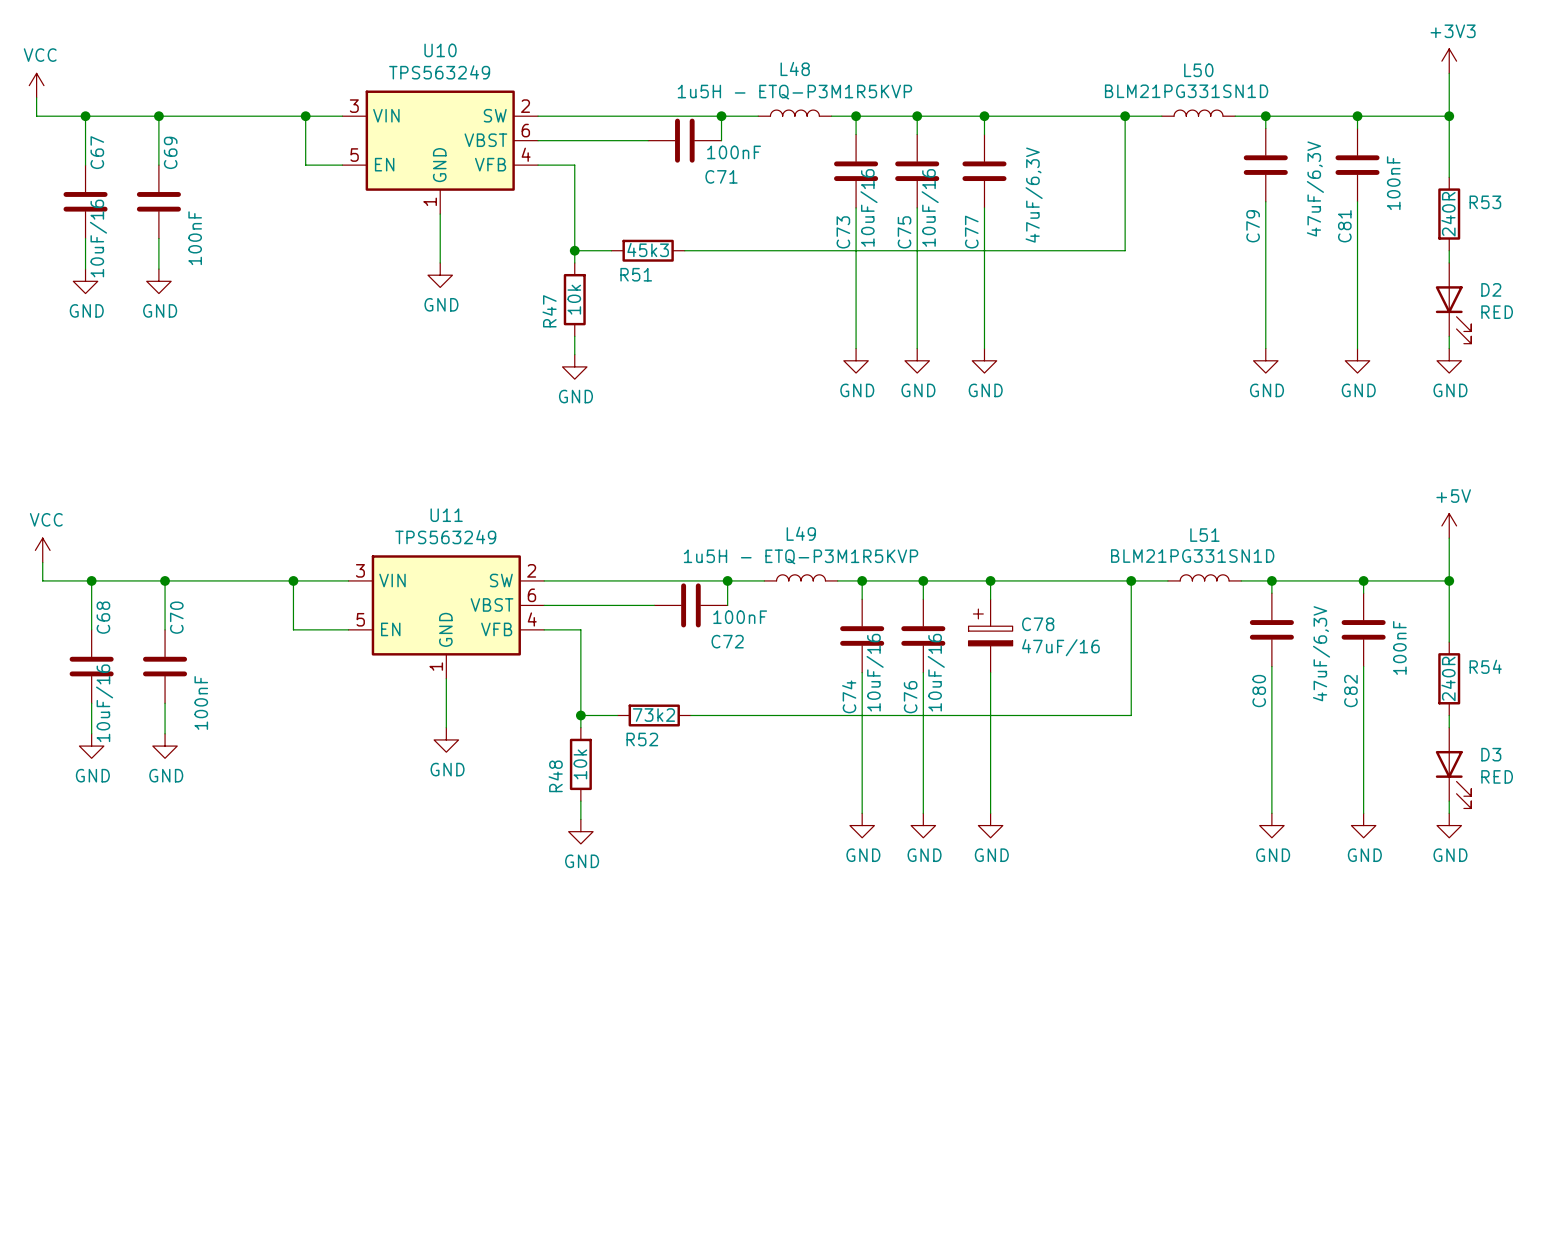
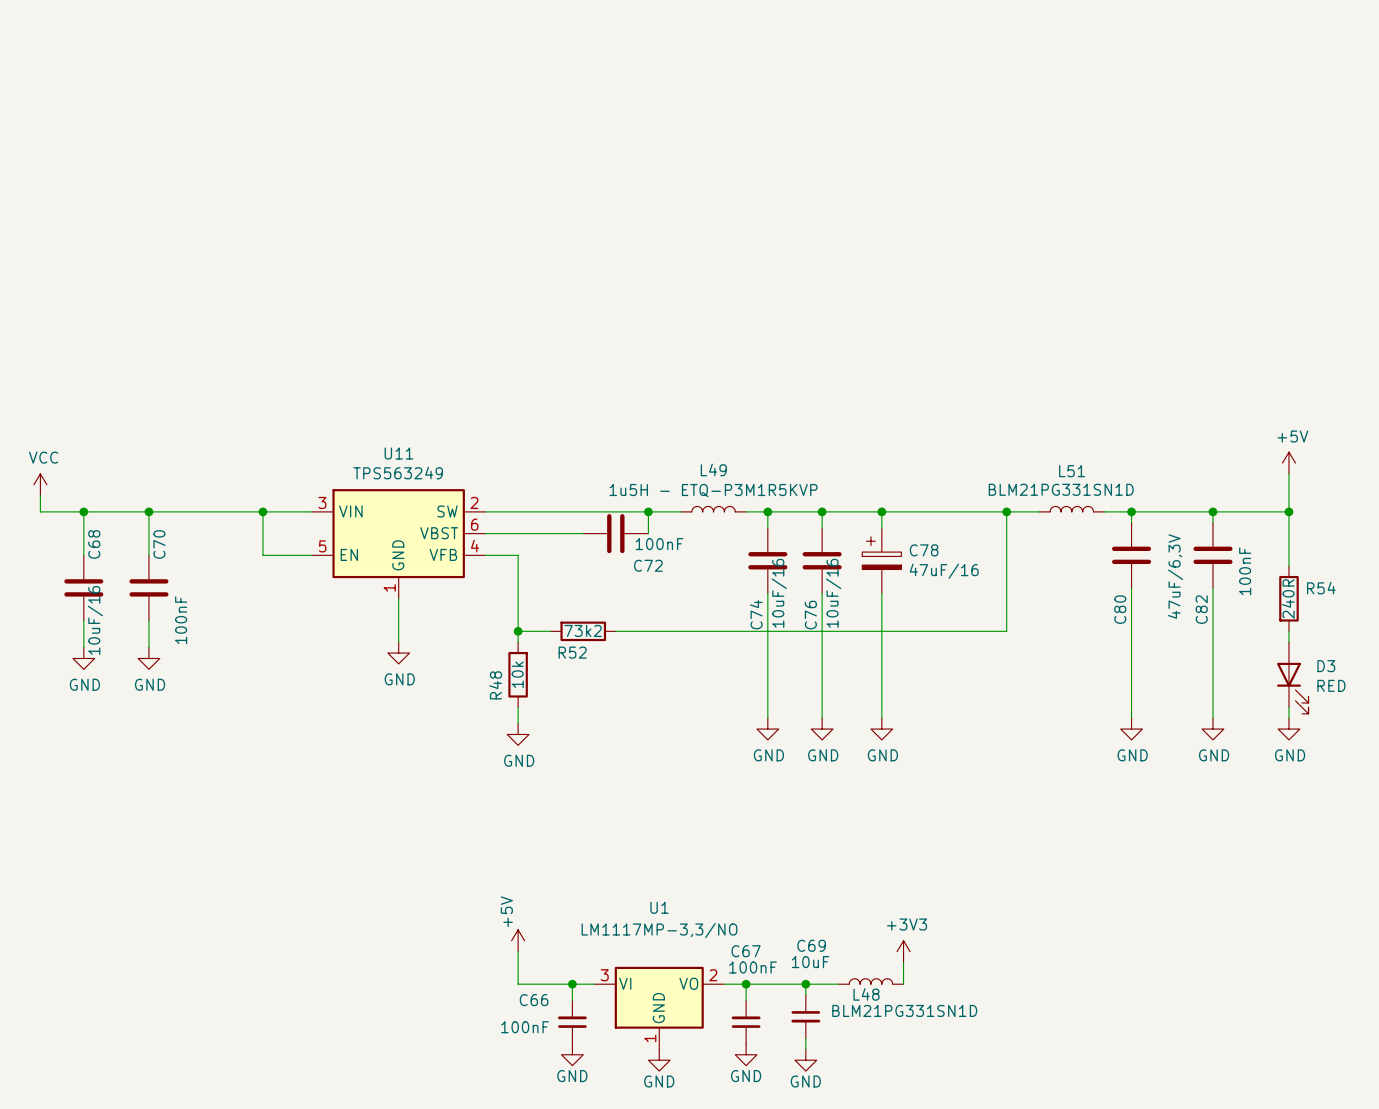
power symbol: +3V3 (1449, 61) -> none
L48 name position: L48 (795, 68) -> L48 (866, 994)
wire: (1449, 73) (1449, 177) -> none
power symbol: VCC (36, 85) -> none
L48 value: 1u5H - ETQ-P3M1R5KVP (794, 92) -> BLM21PG331SN1D (904, 1010)
wire: (36, 97) (36, 116) (342, 116) -> none
L48 position: (794, 113) -> (870, 981)
L50: BLM21PG331SN1D (1198, 113) -> none
wire: (85, 116) (85, 165) -> none
junction: (85, 116) -> none
wire: (158, 116) (158, 165) -> none
junction: (158, 116) -> none
wire: (305, 116) (305, 165) (342, 165) -> none
junction: (305, 116) -> none
wire: (538, 116) (758, 116) -> none
wire: (721, 116) (721, 140) -> none
junction: (721, 116) -> none
wire: (831, 116) (1161, 116) -> none
wire: (856, 116) (856, 134) -> none
junction: (856, 116) -> none
wire: (917, 116) (917, 134) -> none
junction: (917, 116) -> none
wire: (984, 116) (984, 134) -> none
junction: (984, 116) -> none
wire: (1125, 116) (1125, 250) (684, 250) -> none
junction: (1125, 116) -> none
wire: (1235, 116) (1449, 116) -> none
wire: (1265, 116) (1265, 128) -> none
junction: (1265, 116) -> none
wire: (1357, 116) (1357, 128) -> none
junction: (1357, 116) -> none
junction: (1449, 116) -> none
wire: (538, 140) (648, 140) -> none
C71: 100nF (684, 140) -> none
C67 name position: C67 (97, 152) -> C67 (746, 951)
C69 name position: C69 (170, 152) -> C69 (811, 945)
U10: TPS563249 (440, 152) -> none
C67 symbol: [63, 165, 108, 239] -> [731, 1000, 761, 1044]
C69 symbol: [136, 165, 181, 239] -> [791, 995, 821, 1039]
wire: (538, 165) (574, 165) (574, 262) -> none
C79: 47uF/6,3V (1265, 165) -> none
C81: 100nF (1357, 165) -> none
C73: 10uF/16 (856, 171) -> none
C75: 10uF/16 (917, 171) -> none
C77: 47uF/6,3V (984, 171) -> none
wire: (1265, 201) (1265, 348) -> none
wire: (1357, 201) (1357, 348) -> none
wire: (856, 207) (856, 348) -> none
wire: (917, 207) (917, 348) -> none
wire: (984, 207) (984, 348) -> none
wire: (440, 214) (440, 262) -> none
R53: 240R (1449, 214) -> none
wire: (85, 238) (85, 269) -> none
C67 value: 10uF/16 (98, 238) -> 100nF (753, 967)
wire: (158, 238) (158, 269) -> none
C69 value: 100nF (195, 238) -> 10uF (810, 962)
wire: (574, 250) (611, 250) -> none
junction: (574, 250) -> none
R51: 45k3 (648, 250) -> none
wire: (1449, 250) (1449, 262) -> none
power symbol: GND (440, 275) -> none
power symbol: GND (85, 281) -> none
power symbol: GND (158, 281) -> none
R47: 10k (574, 299) -> none
D2: RED (1453, 303) -> none
wire: (574, 336) (574, 354) -> none
wire: (1449, 336) (1449, 348) -> none
power symbol: GND (856, 360) -> none
power symbol: GND (917, 360) -> none
power symbol: GND (984, 360) -> none
power symbol: GND (1265, 360) -> none
power symbol: GND (1357, 360) -> none
power symbol: GND (1449, 360) -> none
power symbol: GND (574, 366) -> none
power symbol: none -> +5V (518, 940)
wire: none -> (518, 951) (518, 984) (594, 984)
power symbol: none -> +3V3 (903, 951)
wire: none -> (903, 962) (903, 984)
wire: none -> (572, 984) (572, 1000)
junction: none -> (572, 984)
wire: none -> (724, 984) (838, 984)
wire: none -> (746, 984) (746, 1000)
junction: none -> (746, 984)
wire: none -> (805, 984) (805, 995)
junction: none -> (805, 984)
U1: none -> LM1117MP-3,3/NO (659, 1008)
C66: none -> 100nF (572, 1022)
wire: none -> (805, 1038) (805, 1049)
power symbol: none -> GND (572, 1054)
power symbol: none -> GND (746, 1054)
power symbol: none -> GND (659, 1060)
power symbol: none -> GND (805, 1060)

